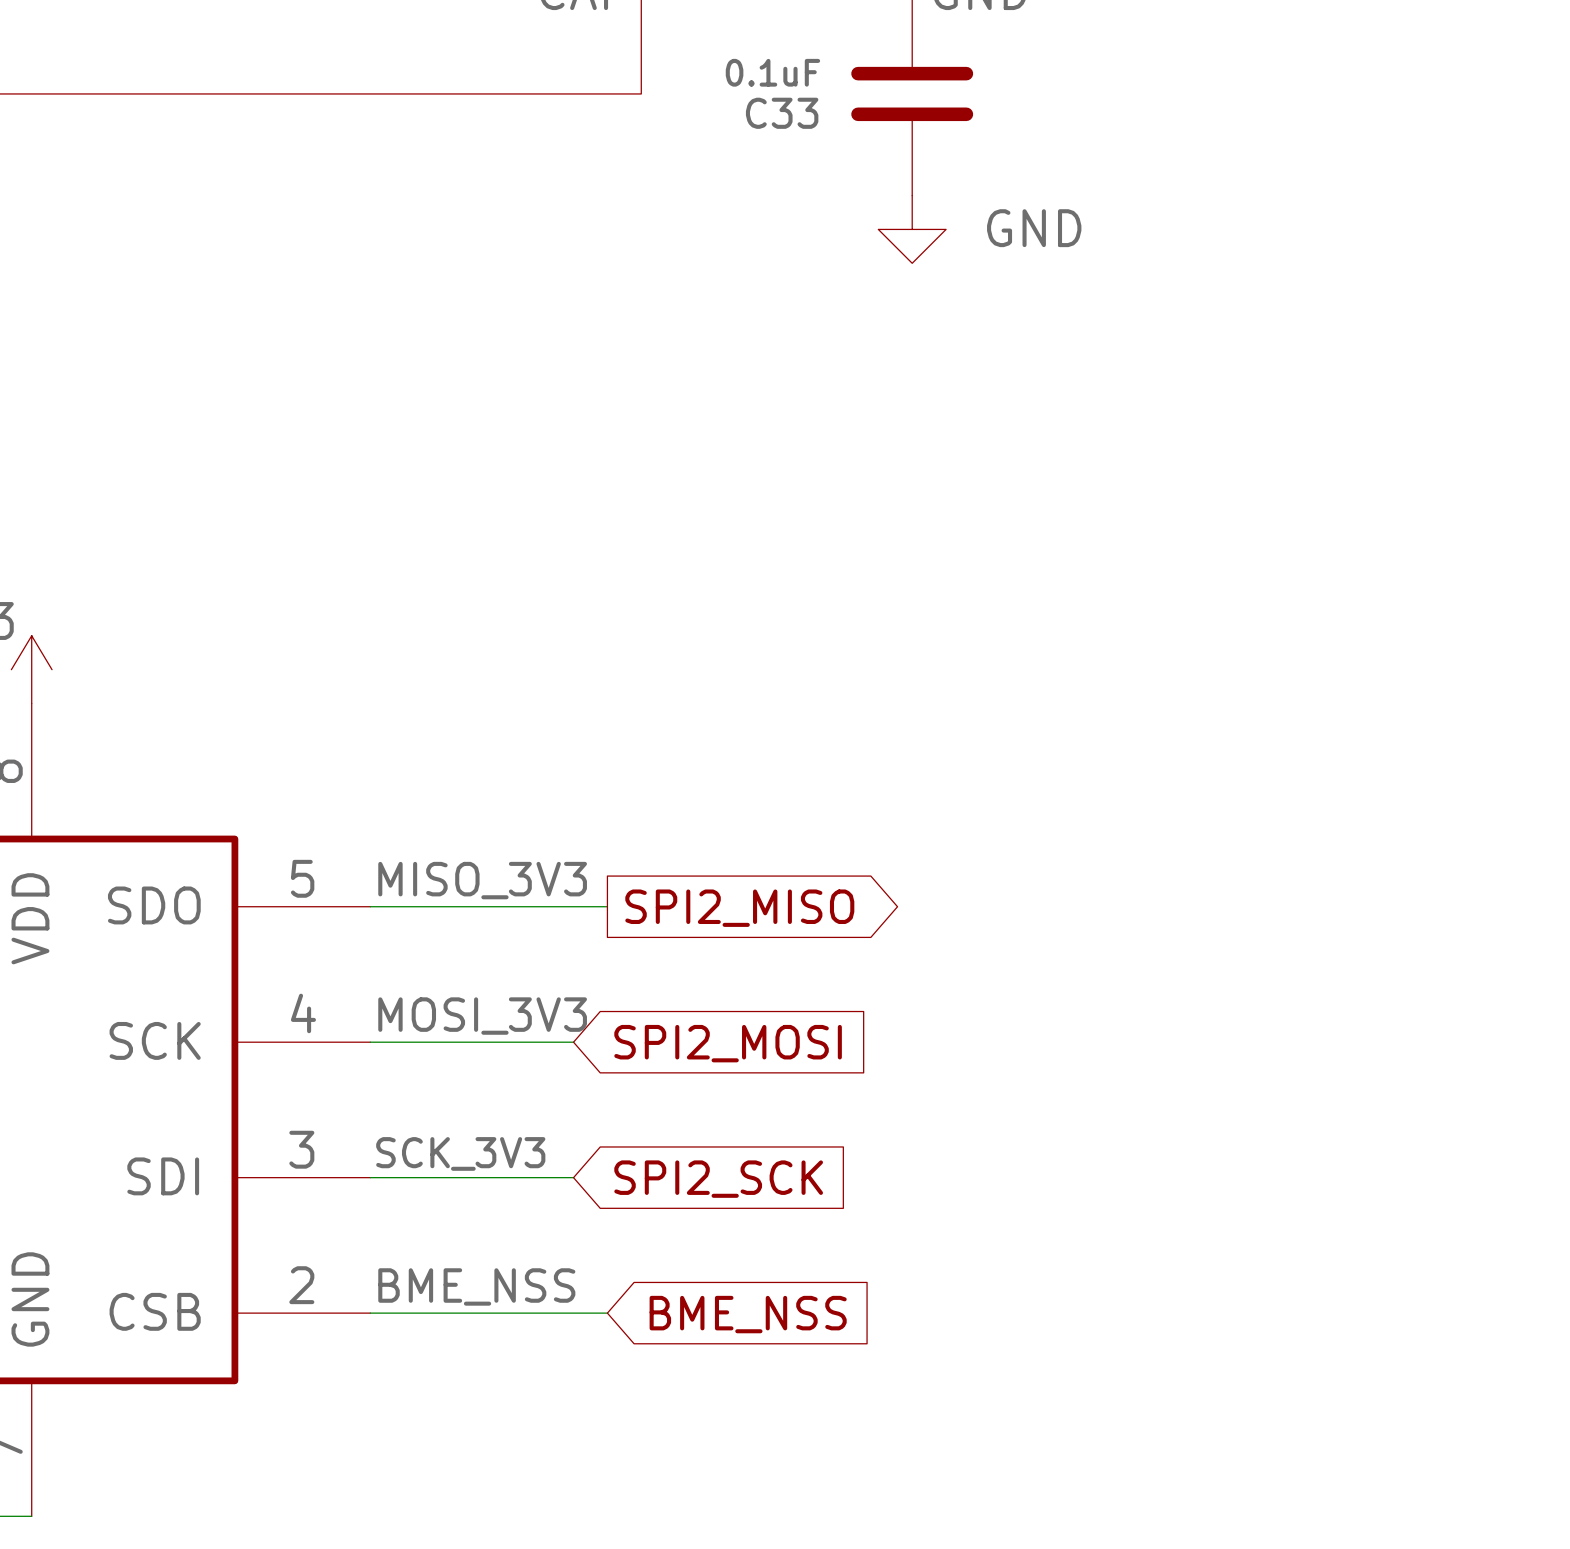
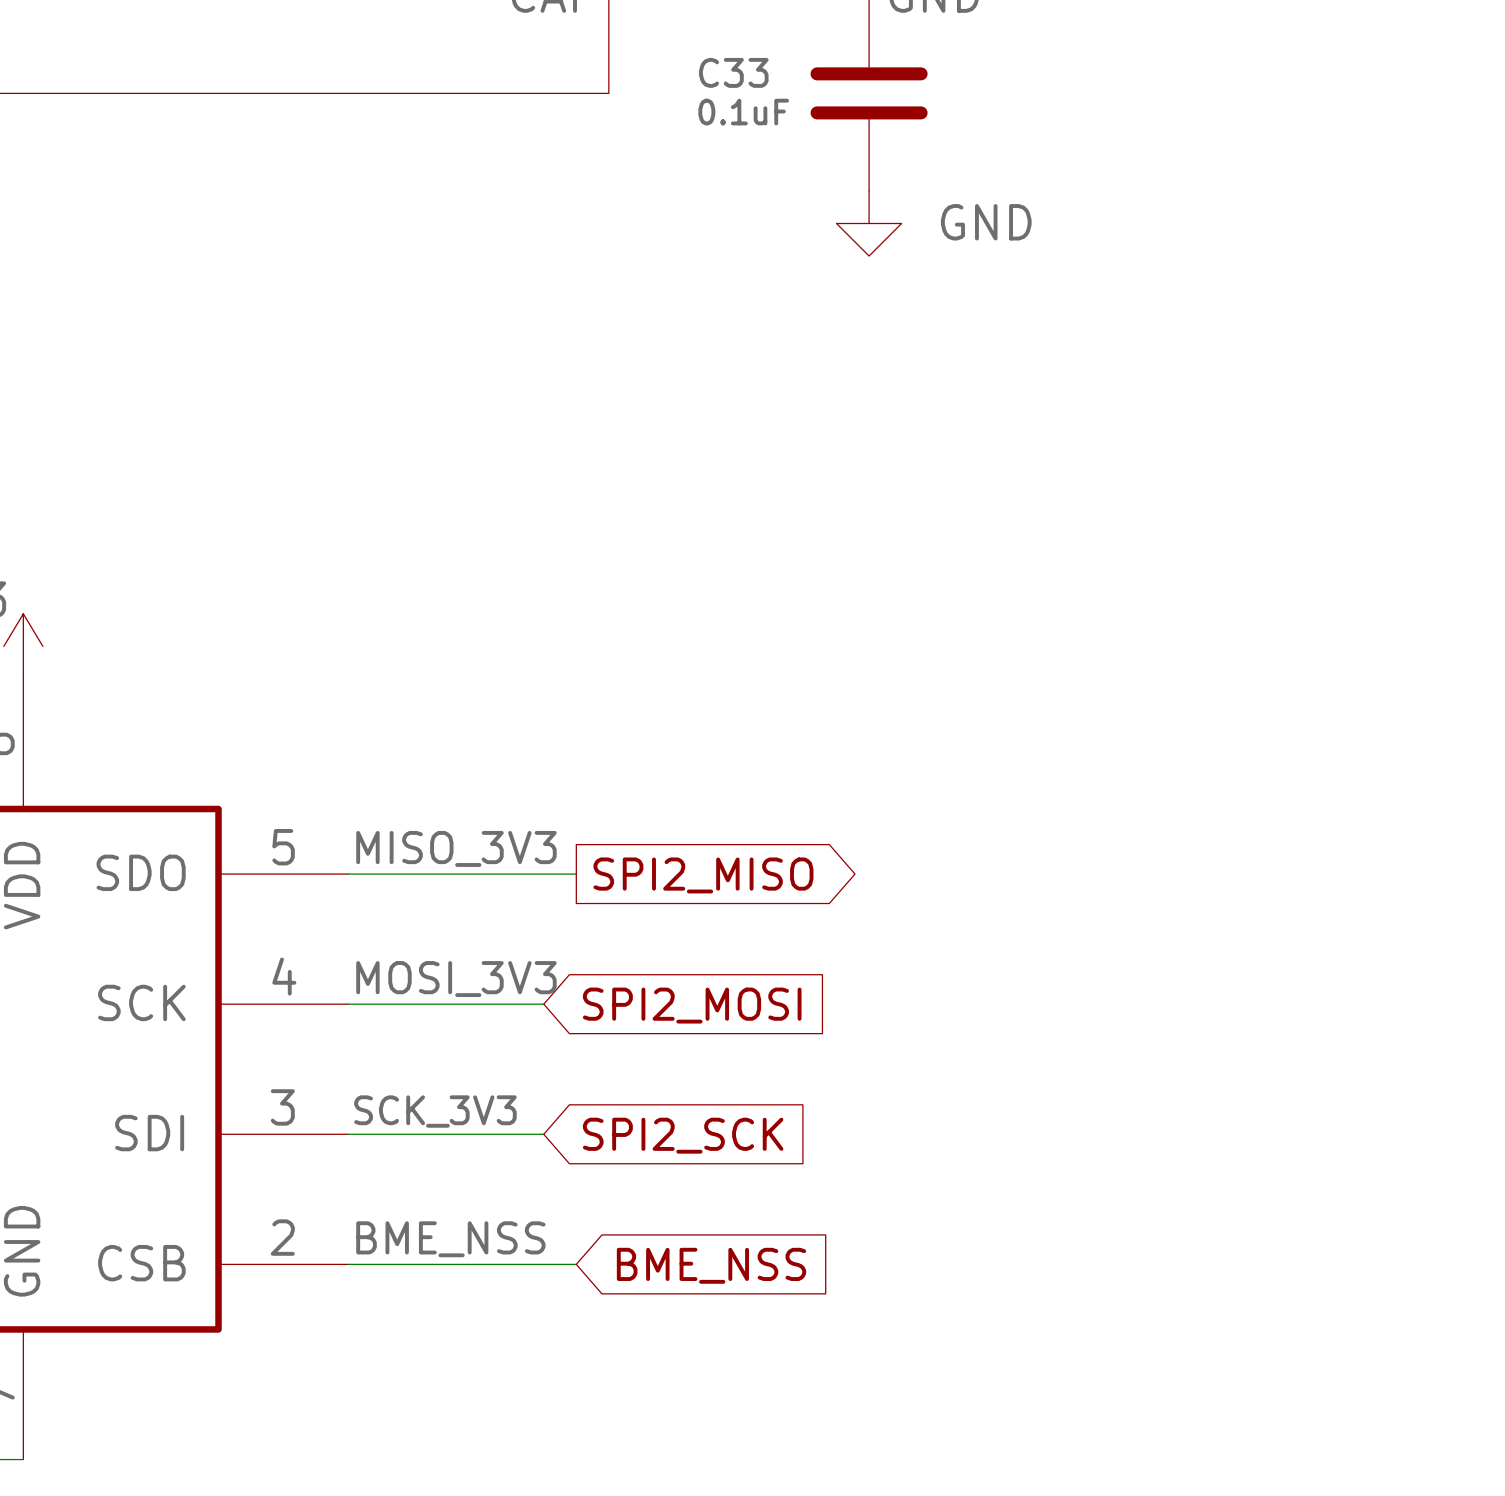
C33 value position: 0.1uF (772, 72) -> 0.1uF (743, 112)
C33 name position: C33 (782, 113) -> C33 (733, 72)

